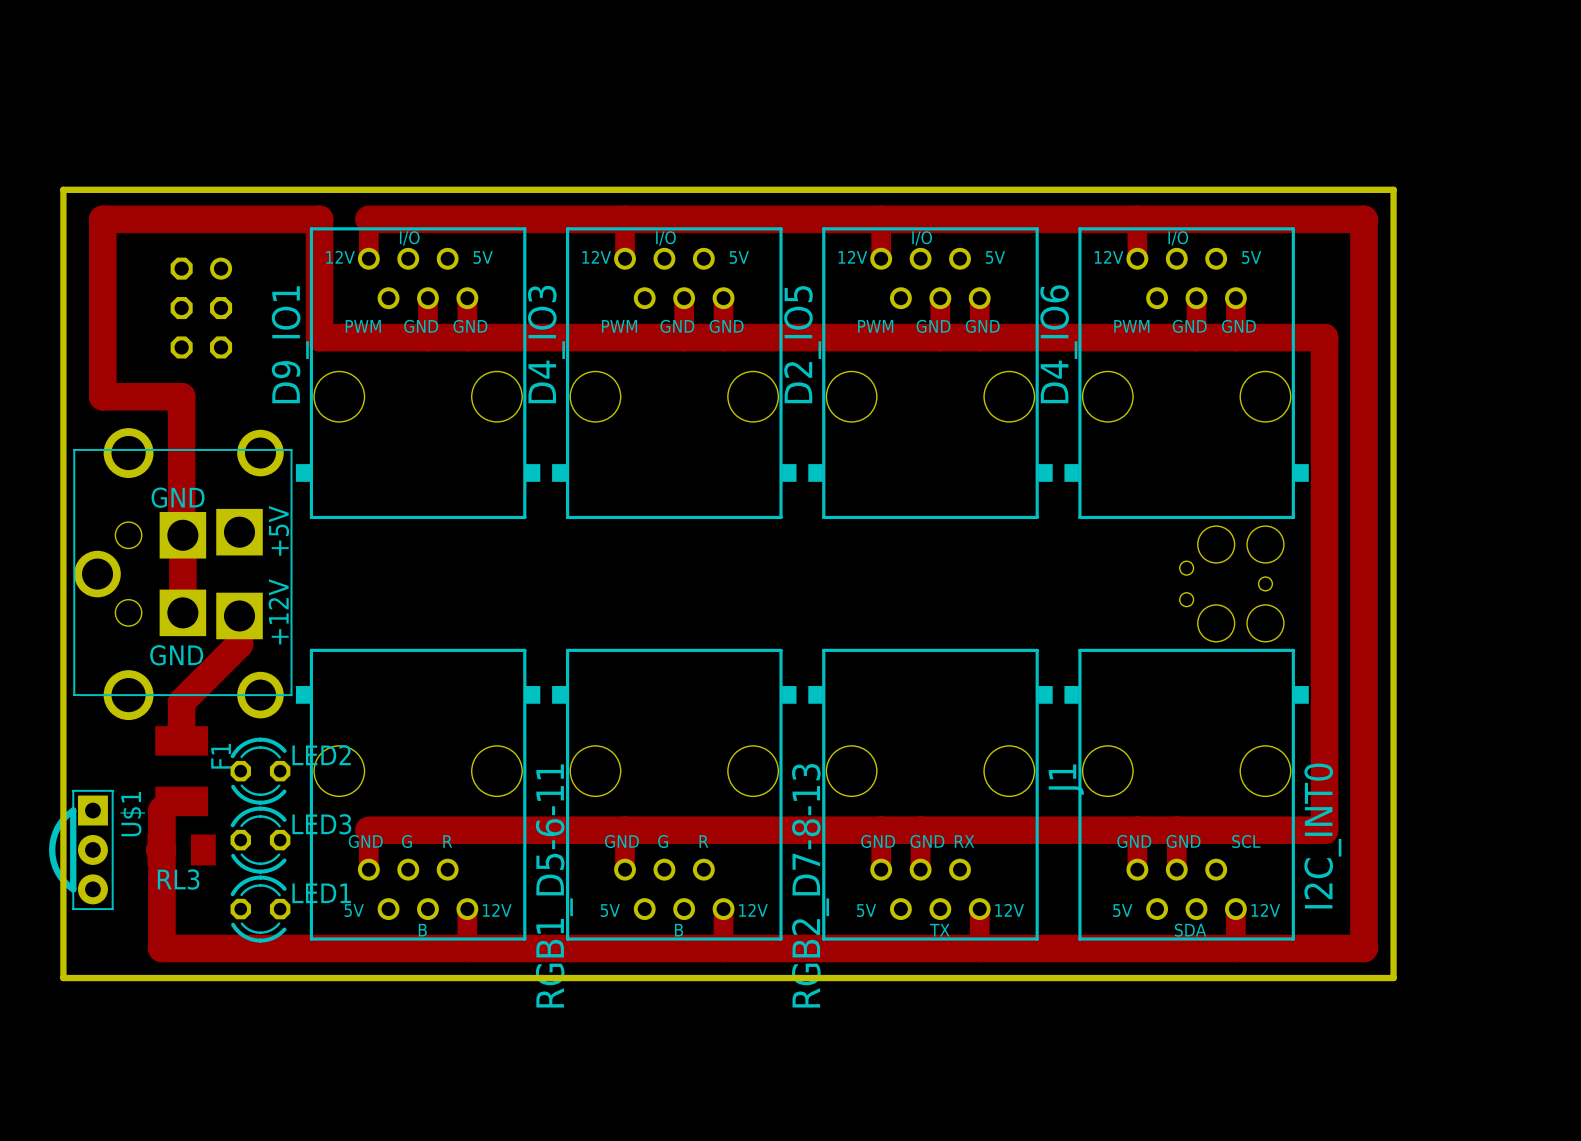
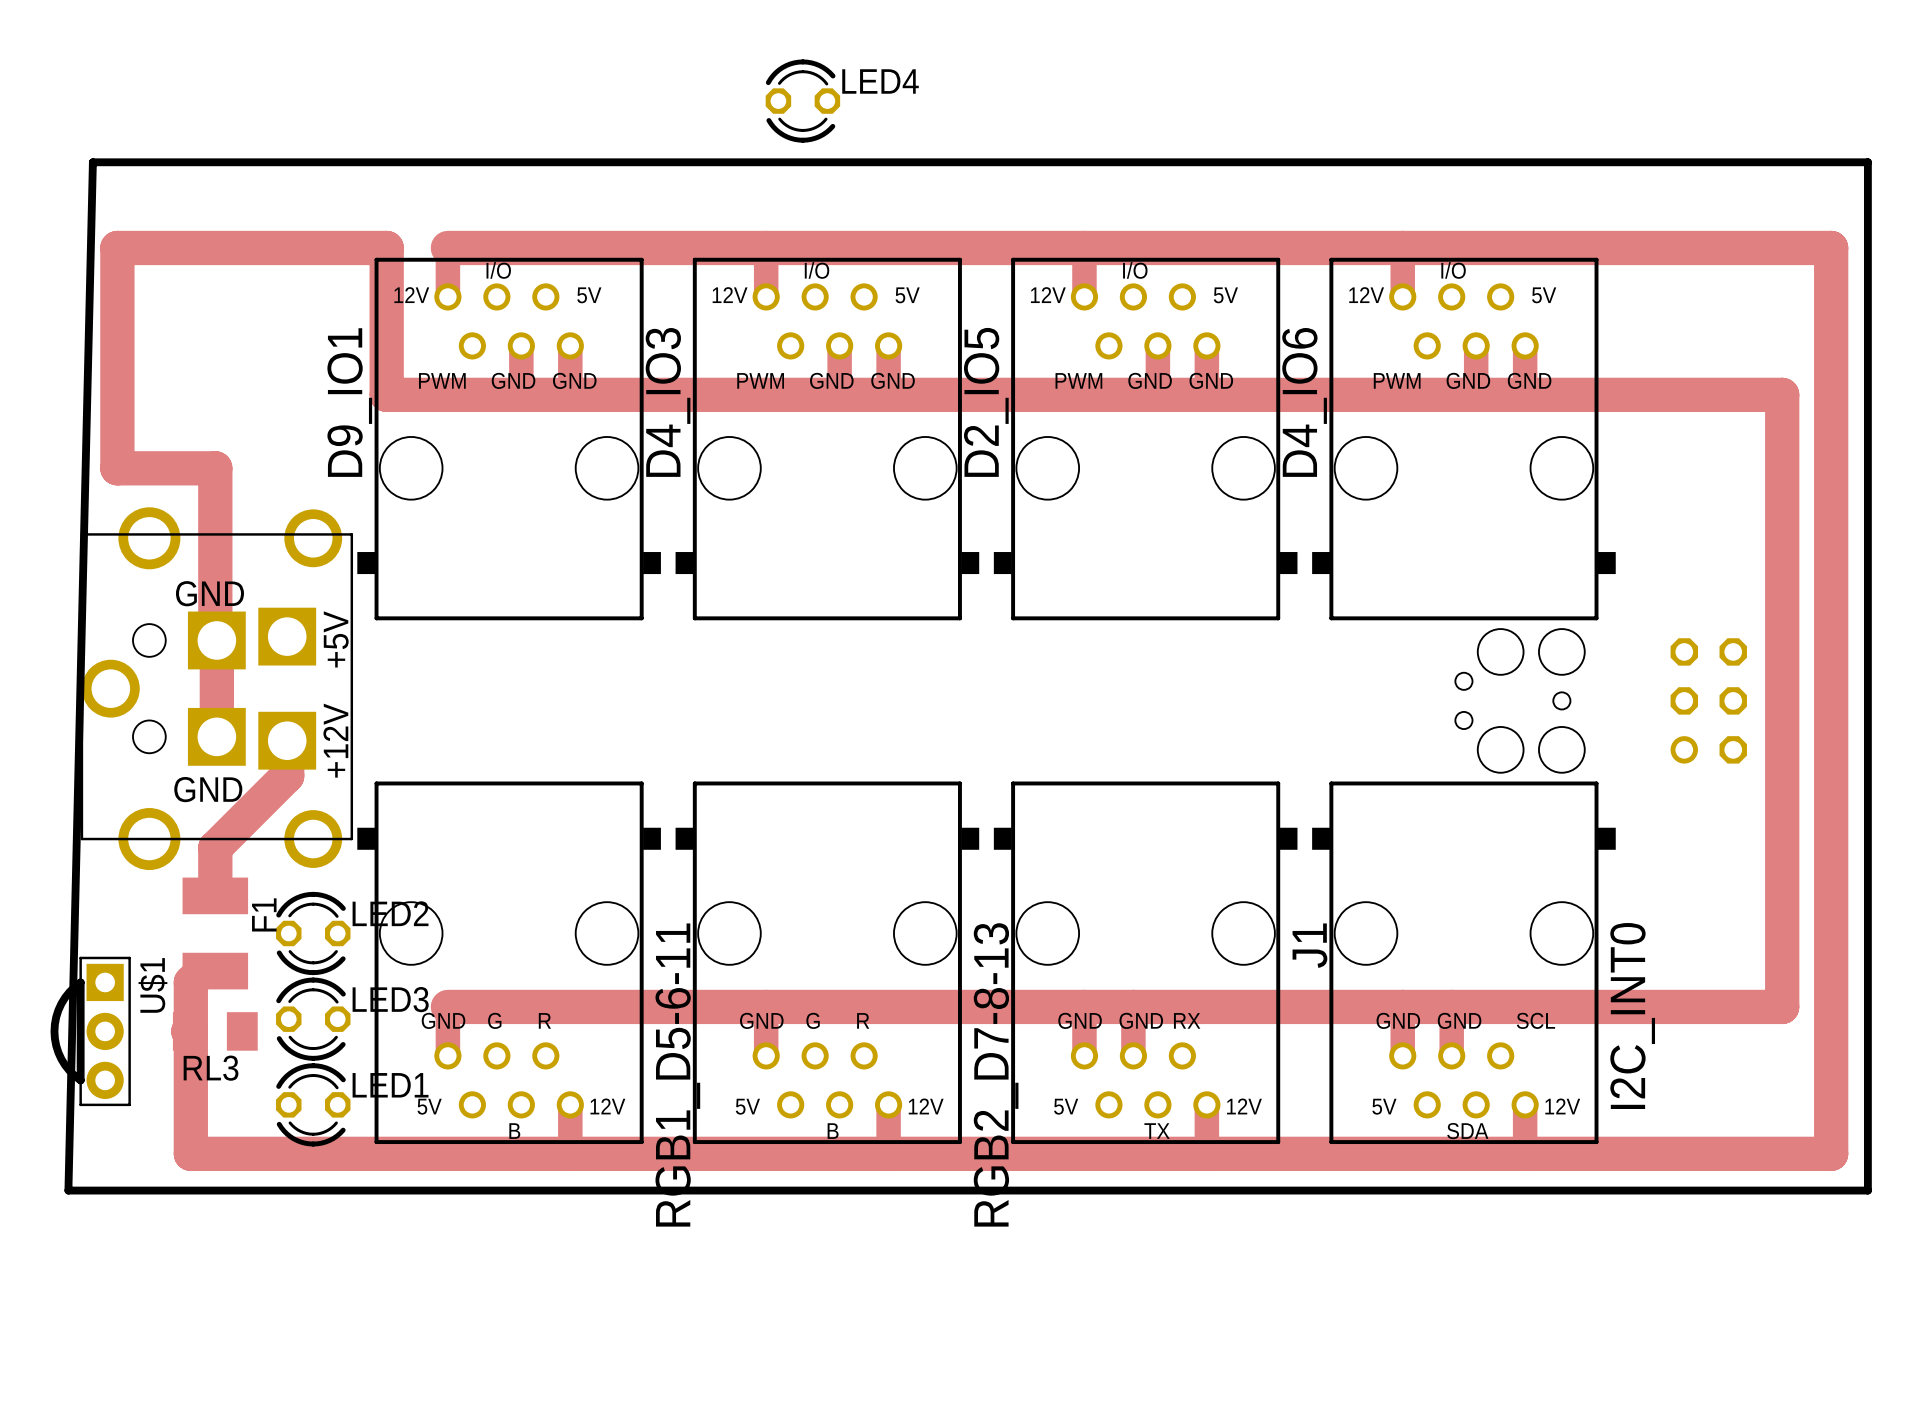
LED4: none -> (802, 101)
track: (1363, 219) (1363, 948) -> (1684, 247) (1831, 247) (1831, 1153) (1684, 1153)
part: (201, 308) -> none
track: (1324, 337) (1324, 830) -> (1635, 394) (1782, 394) (1782, 1006) (1635, 1006)
part: none -> (1708, 700)
board edge: (63, 978) (63, 189) (1393, 189) (1393, 978) -> (68, 1190) (92, 162) (1867, 162) (1867, 1190) (1721, 1190)

